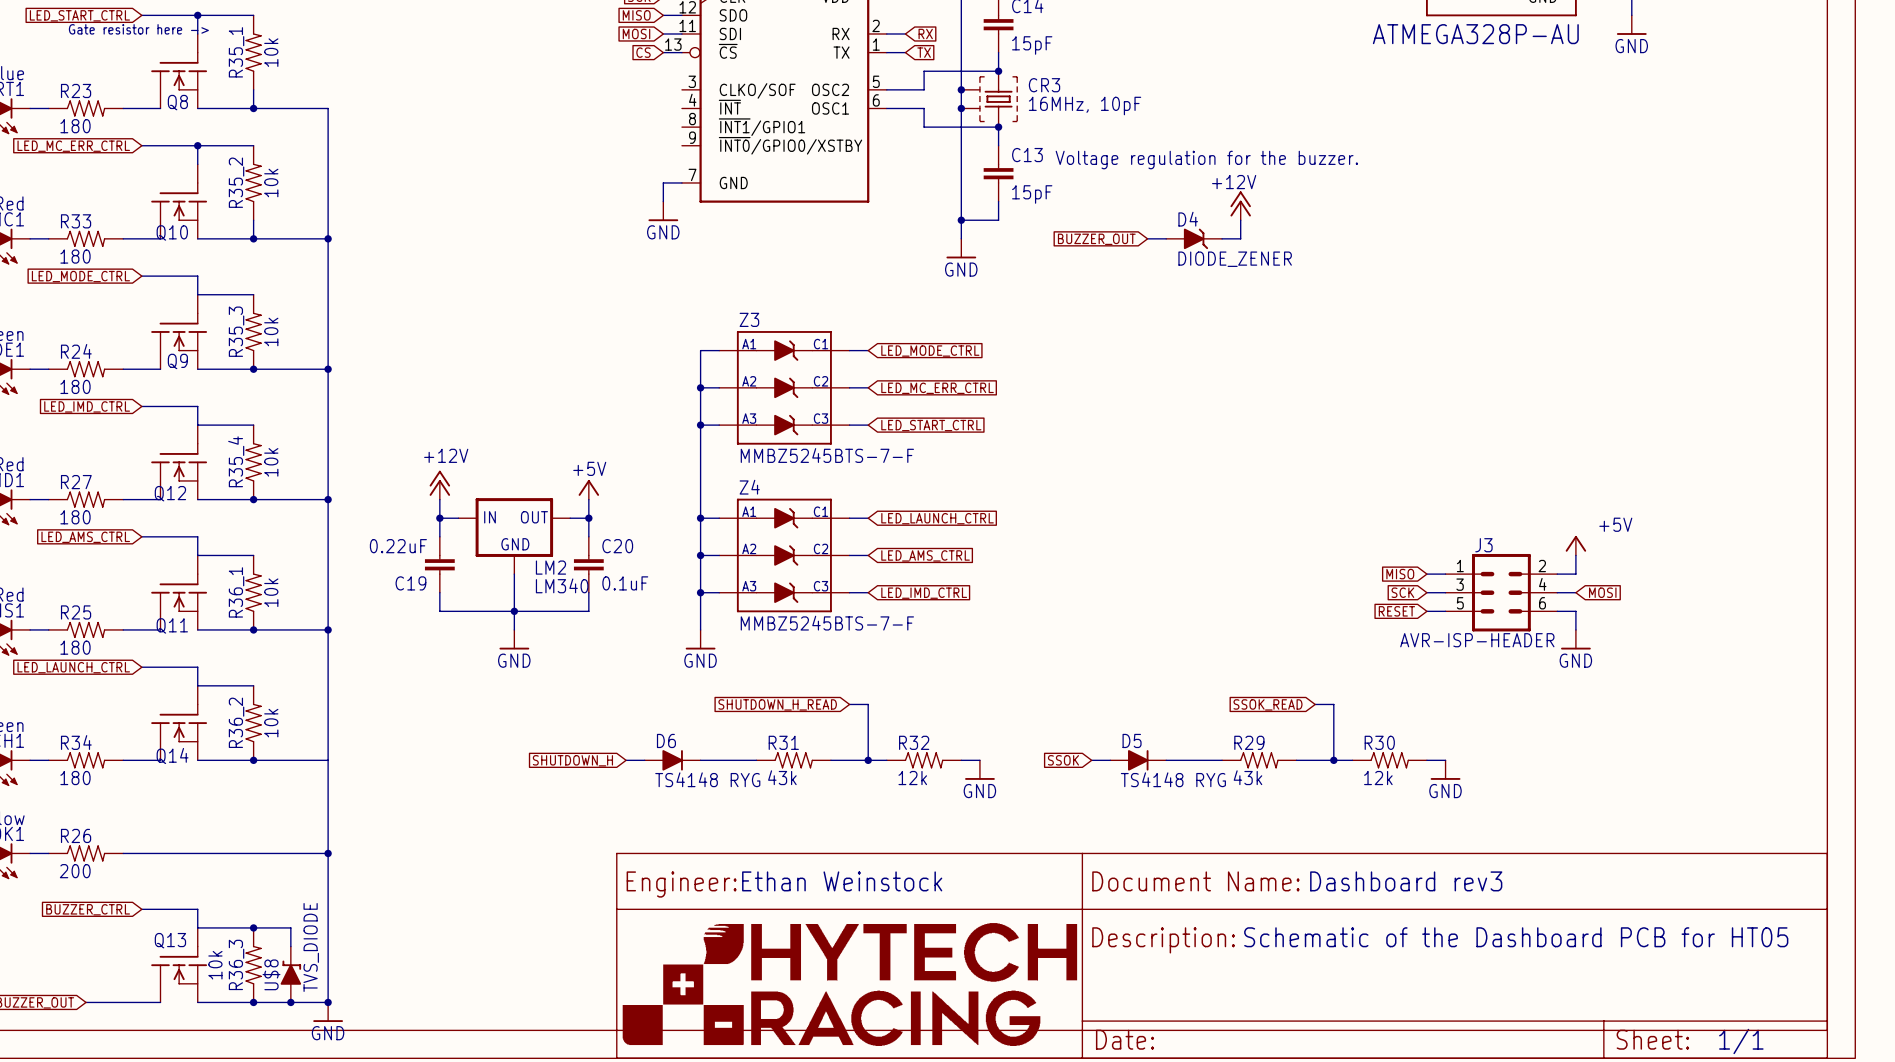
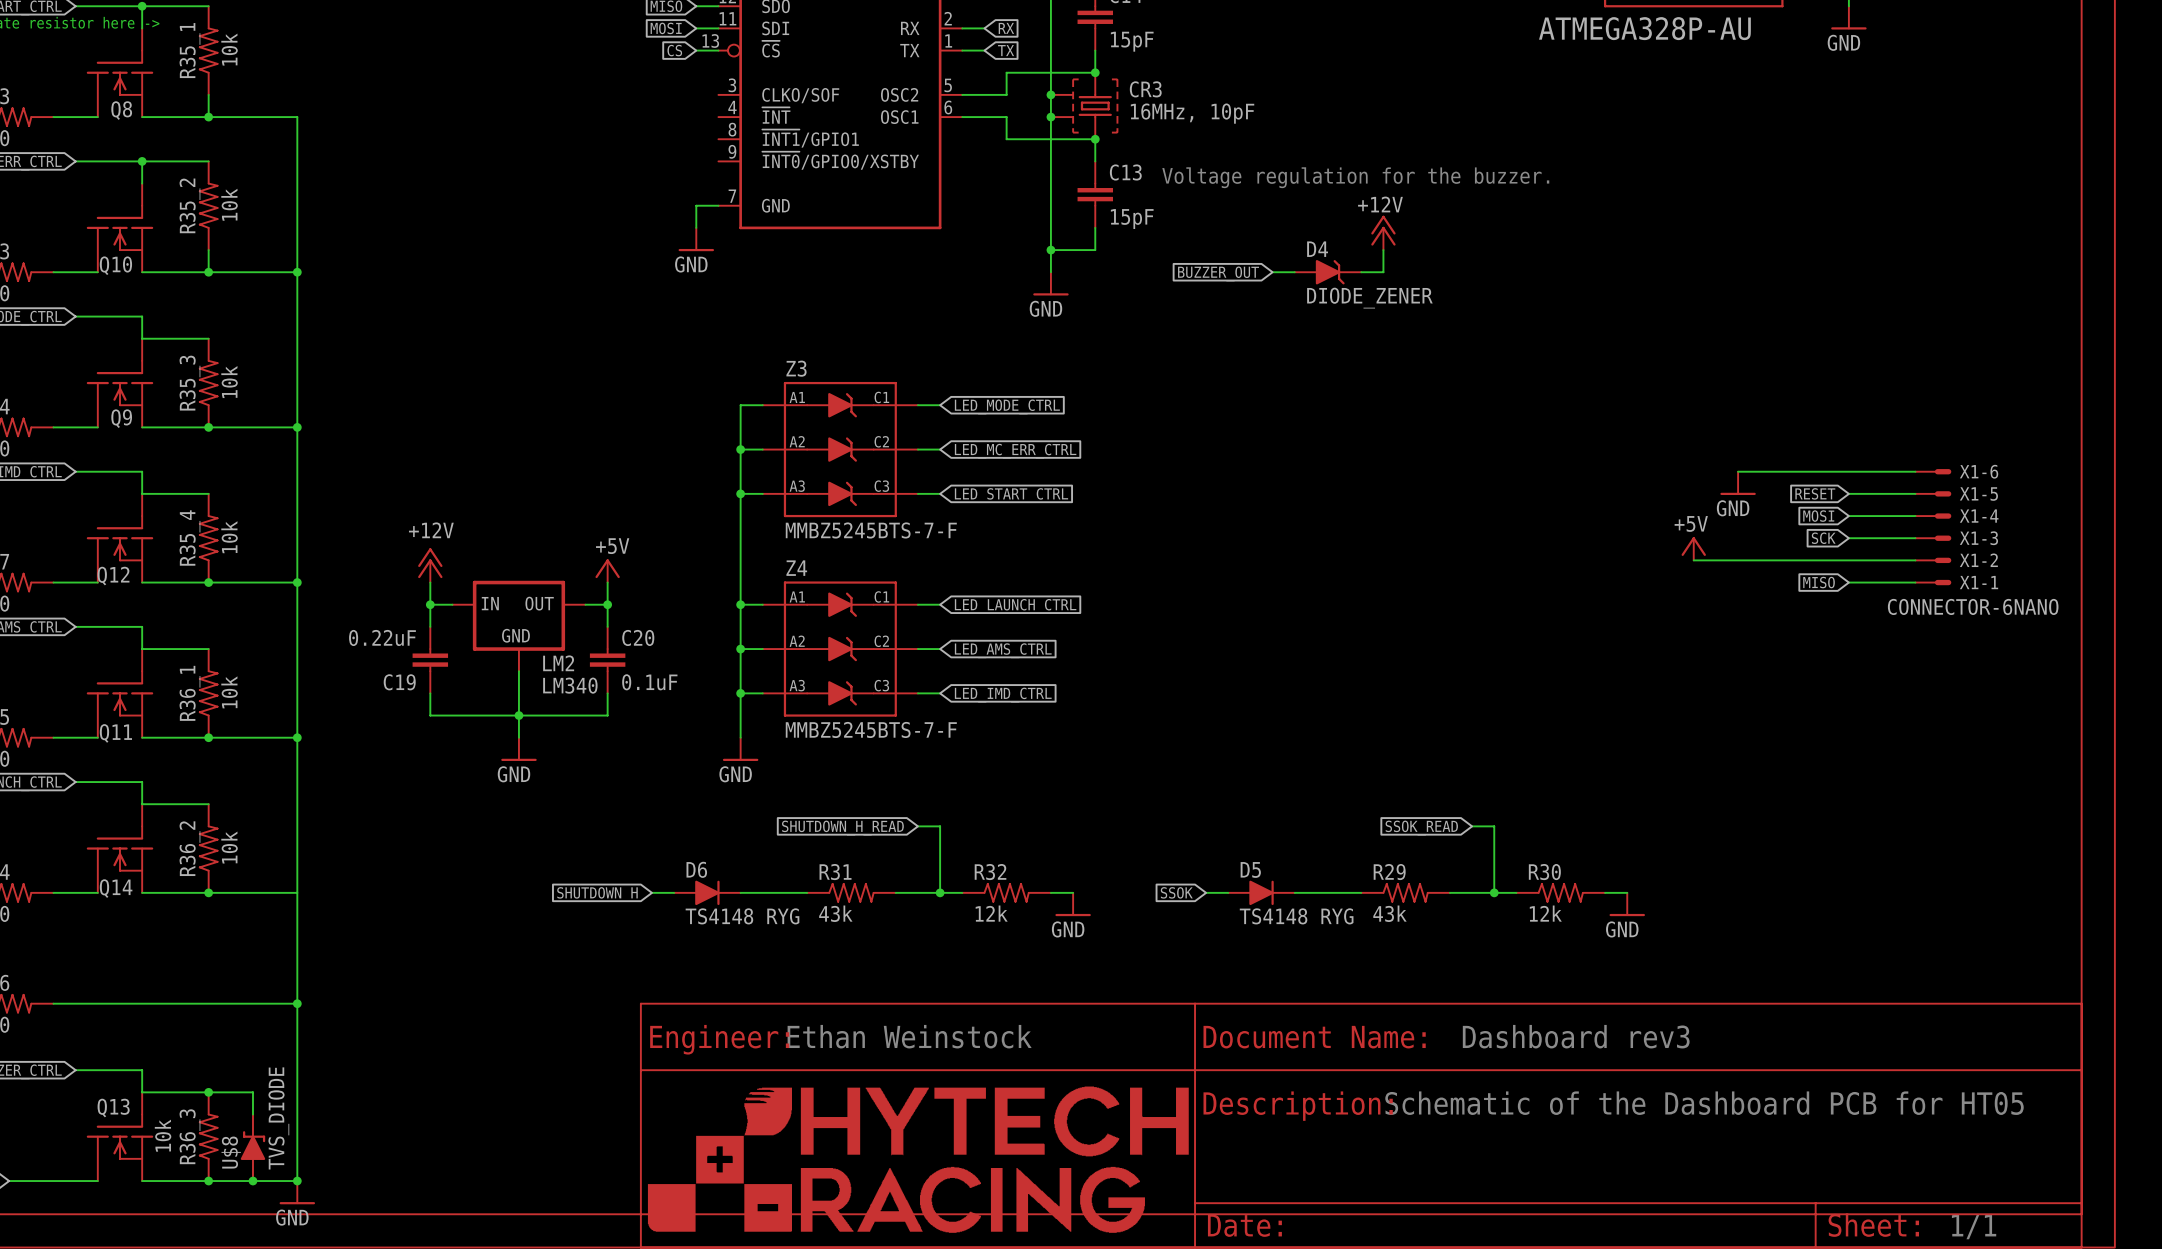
wire: none -> (1738, 471) (1915, 471)
X1-6: none -> (1933, 471)
power symbol: none -> GND (1738, 483)
global label: none -> RESET (1815, 493)
wire: none -> (1848, 493) (1915, 493)
X1-5: none -> (1933, 493)
wire: none -> (1848, 516) (1915, 516)
X1-4: none -> (1933, 516)
global label: none -> SCK (1823, 538)
wire: none -> (1848, 538) (1915, 538)
X1-3: none -> (1933, 538)
wire: none -> (1693, 560) (1915, 560)
X1-2: none -> (1933, 560)
global label: none -> MISO (1819, 582)
wire: none -> (1848, 582) (1915, 582)
X1-1: none -> CONNECTOR-6NANO (1933, 582)
power symbol text position: +5V (1615, 524) -> +5V (1691, 523)
power symbol position: +5V (1575, 545) -> +5V (1693, 548)
wire: (1575, 555) (1575, 574) (1557, 574) -> none
global label: MISO (1400, 574) -> none
wire: (1426, 574) (1445, 574) -> none
global label: SCK (1402, 592) -> none
wire: (1426, 592) (1445, 592) -> none
J3: AVR-ISP-HEADER (1501, 592) -> none
wire: (1557, 592) (1575, 592) -> none
global label rotation: 0° (1602, 592) -> 180° (1818, 516)
global label position: MOSI (1602, 592) -> MOSI (1818, 516)
global label: RESET (1396, 611) -> none
wire: (1426, 611) (1445, 611) -> none
wire: (1557, 611) (1575, 611) (1575, 629) -> none
power symbol: GND (1575, 639) -> none

